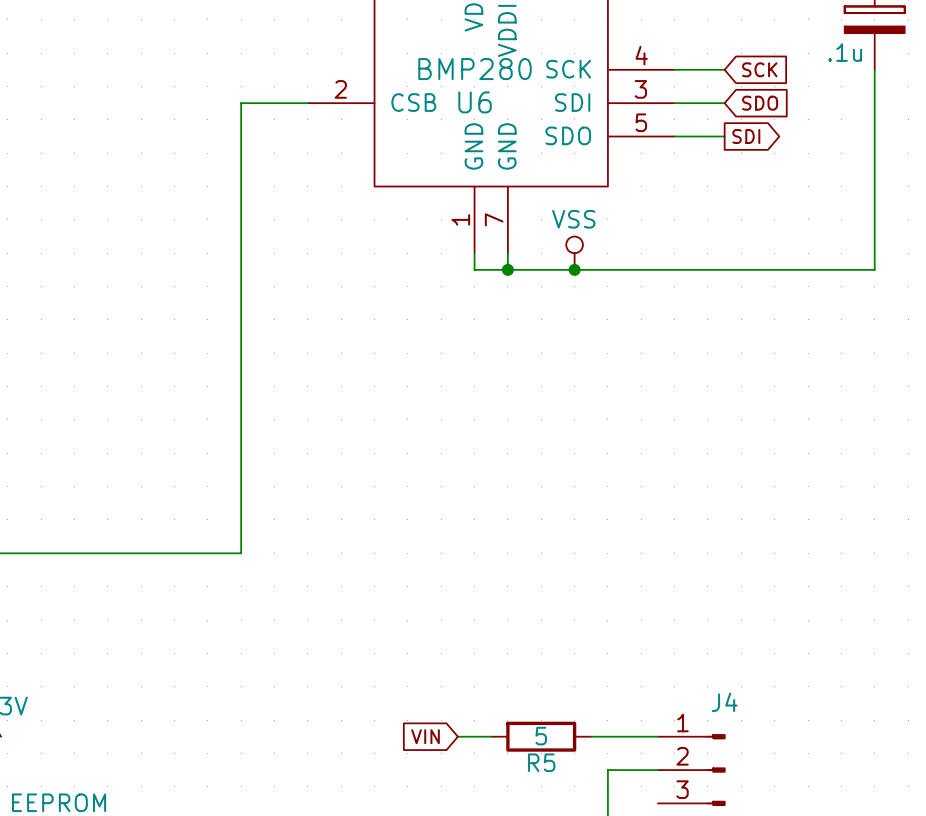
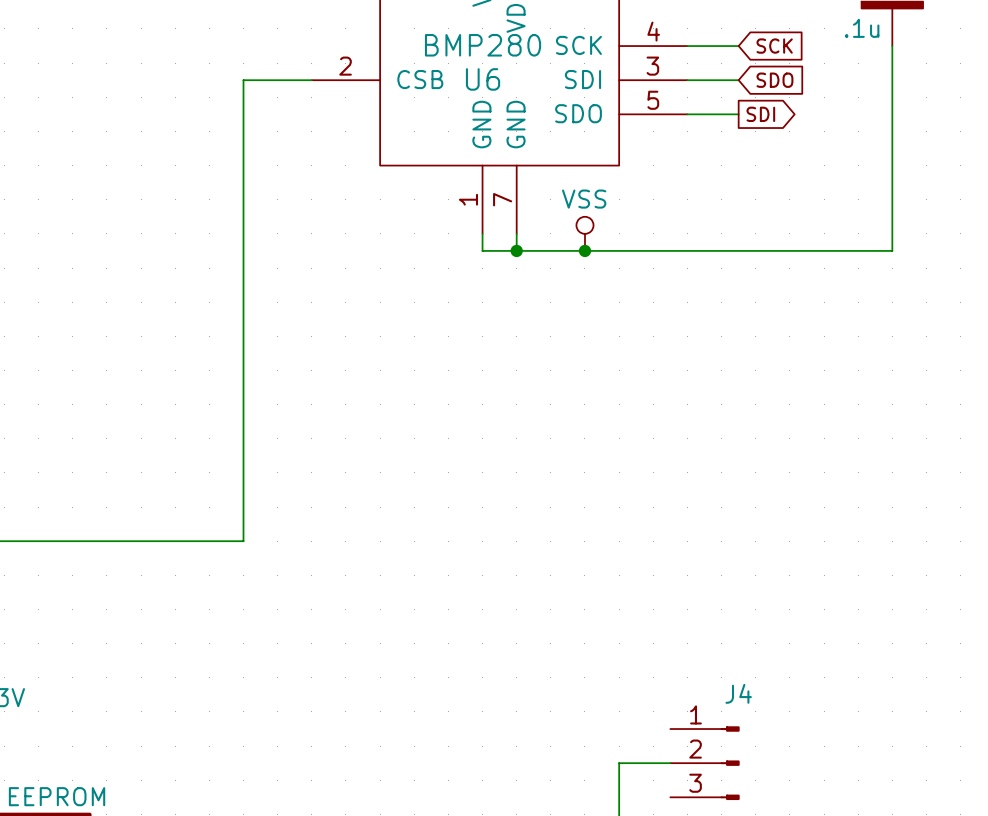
global label: VIN (425, 736) -> none
wire: (457, 736) (491, 736) -> none
R5: 5 (541, 736) -> none
wire: (591, 736) (657, 736) -> none

